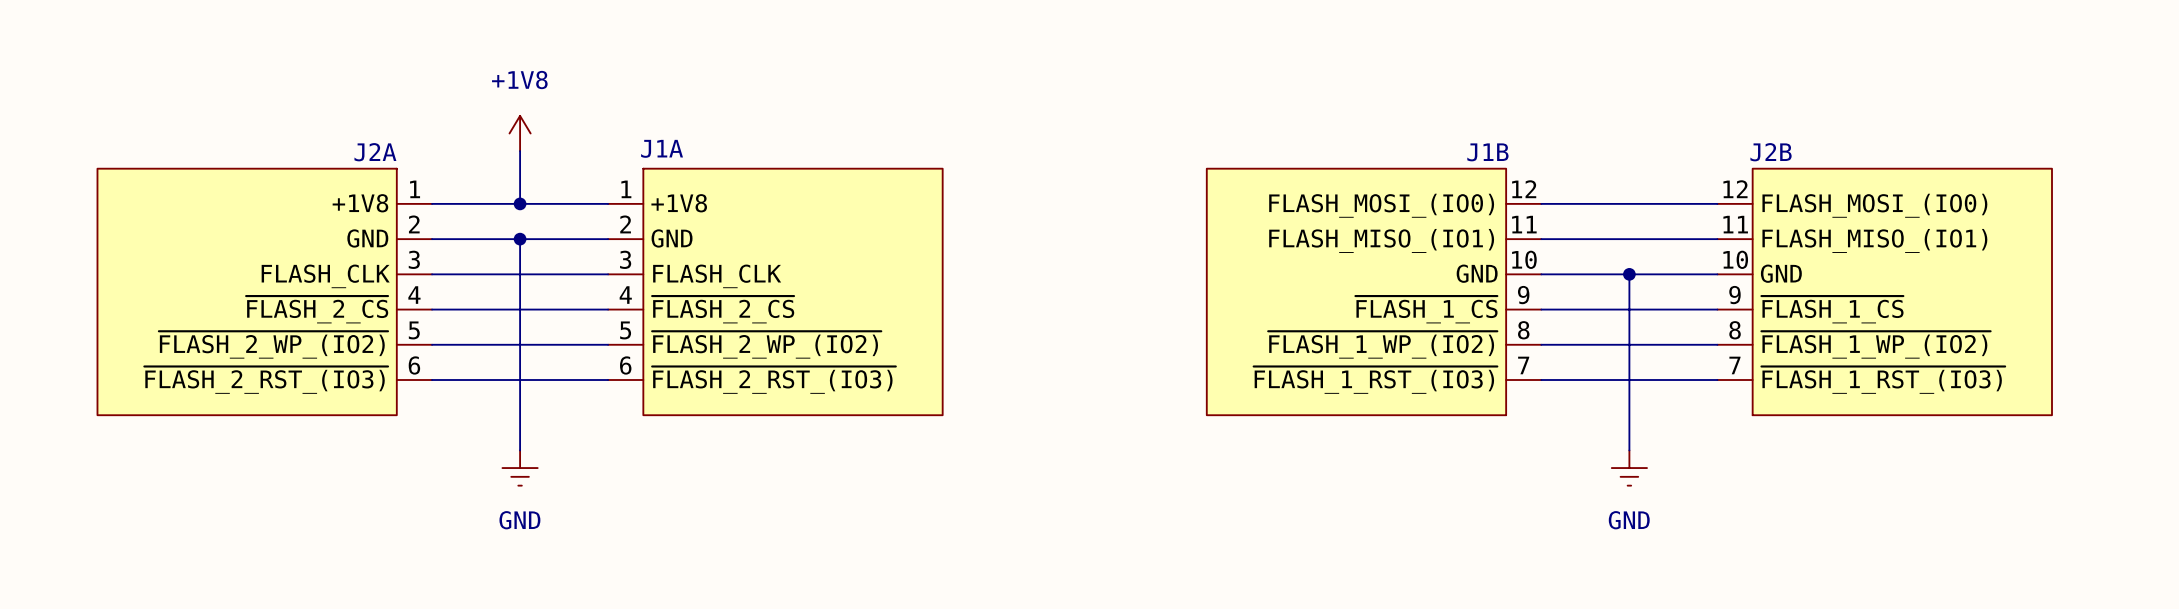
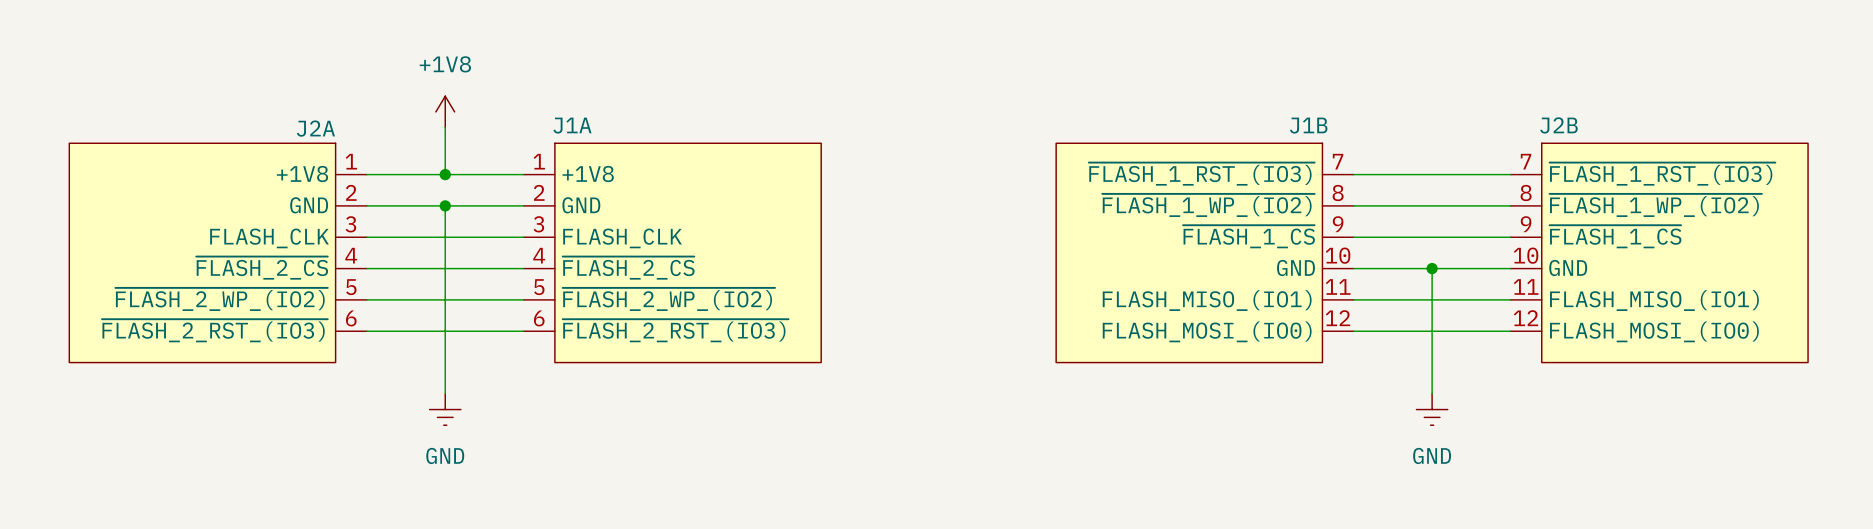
wire: (1629, 274) (1629, 309) -> none
junction position: (1629, 274) -> (1432, 268)
J1B flip: as is (1356, 291) -> up-down (1189, 252)
J2B flip: as is (1902, 291) -> up-down (1674, 252)

